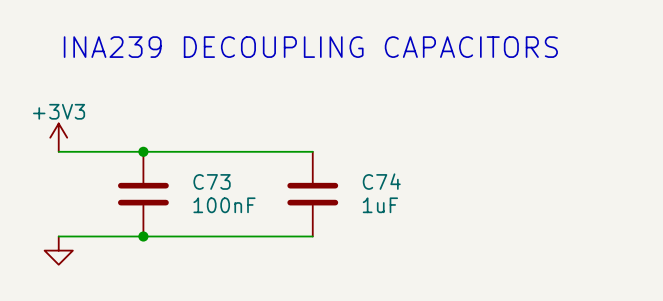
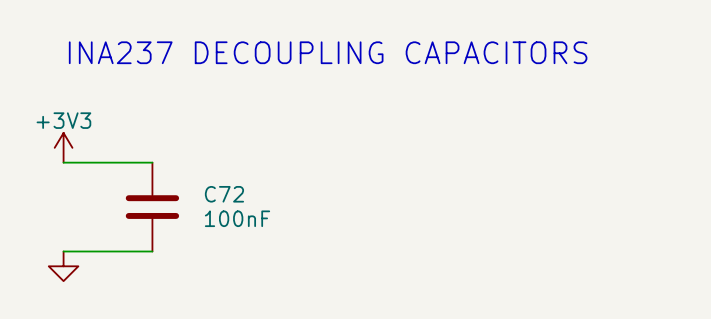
text: INA239 DECOUPLING CAPACITORS (310, 47) -> INA237 DECOUPLING CAPACITORS (328, 52)
wire: (143, 151) (312, 151) -> none
junction: (143, 151) -> none
C73 name: C73 (212, 181) -> C72 (224, 194)
C74: 1uF (312, 194) -> none
wire: (143, 236) (312, 236) -> none
junction: (143, 236) -> none

